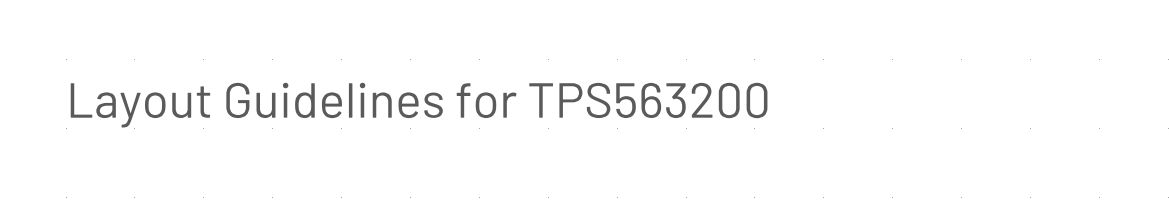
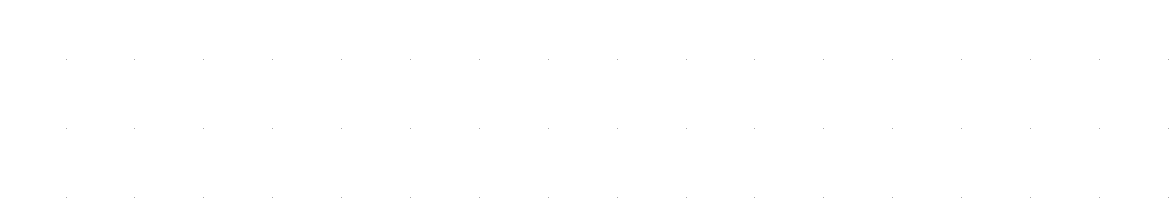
text: Layout Guidelines for TPS563200 (419, 105) -> none

